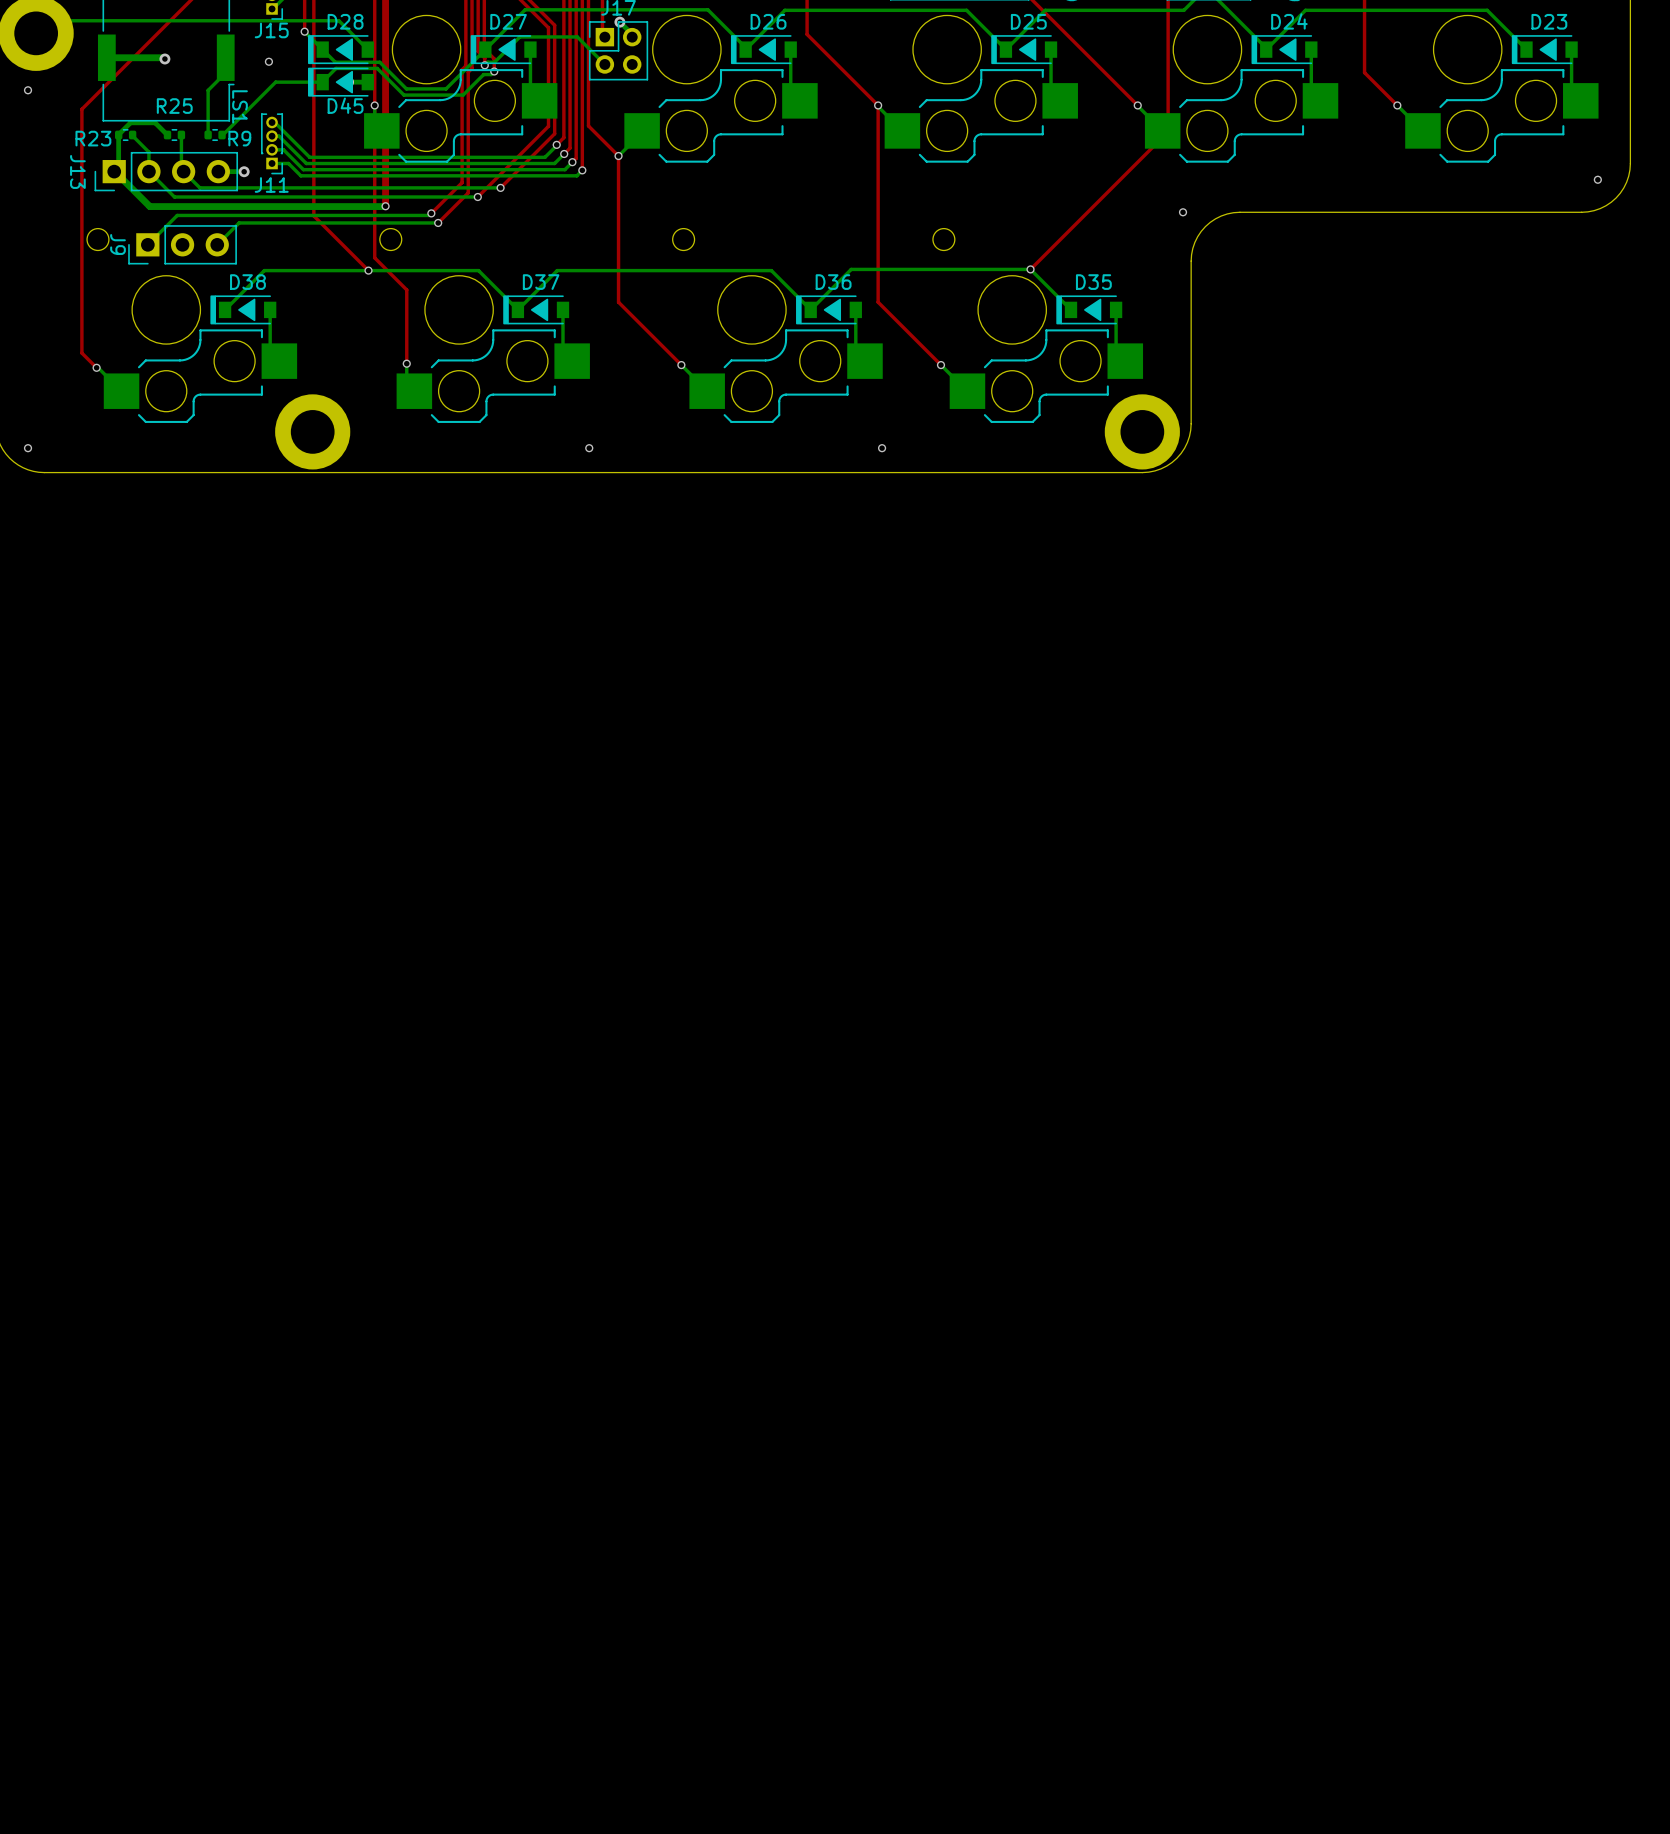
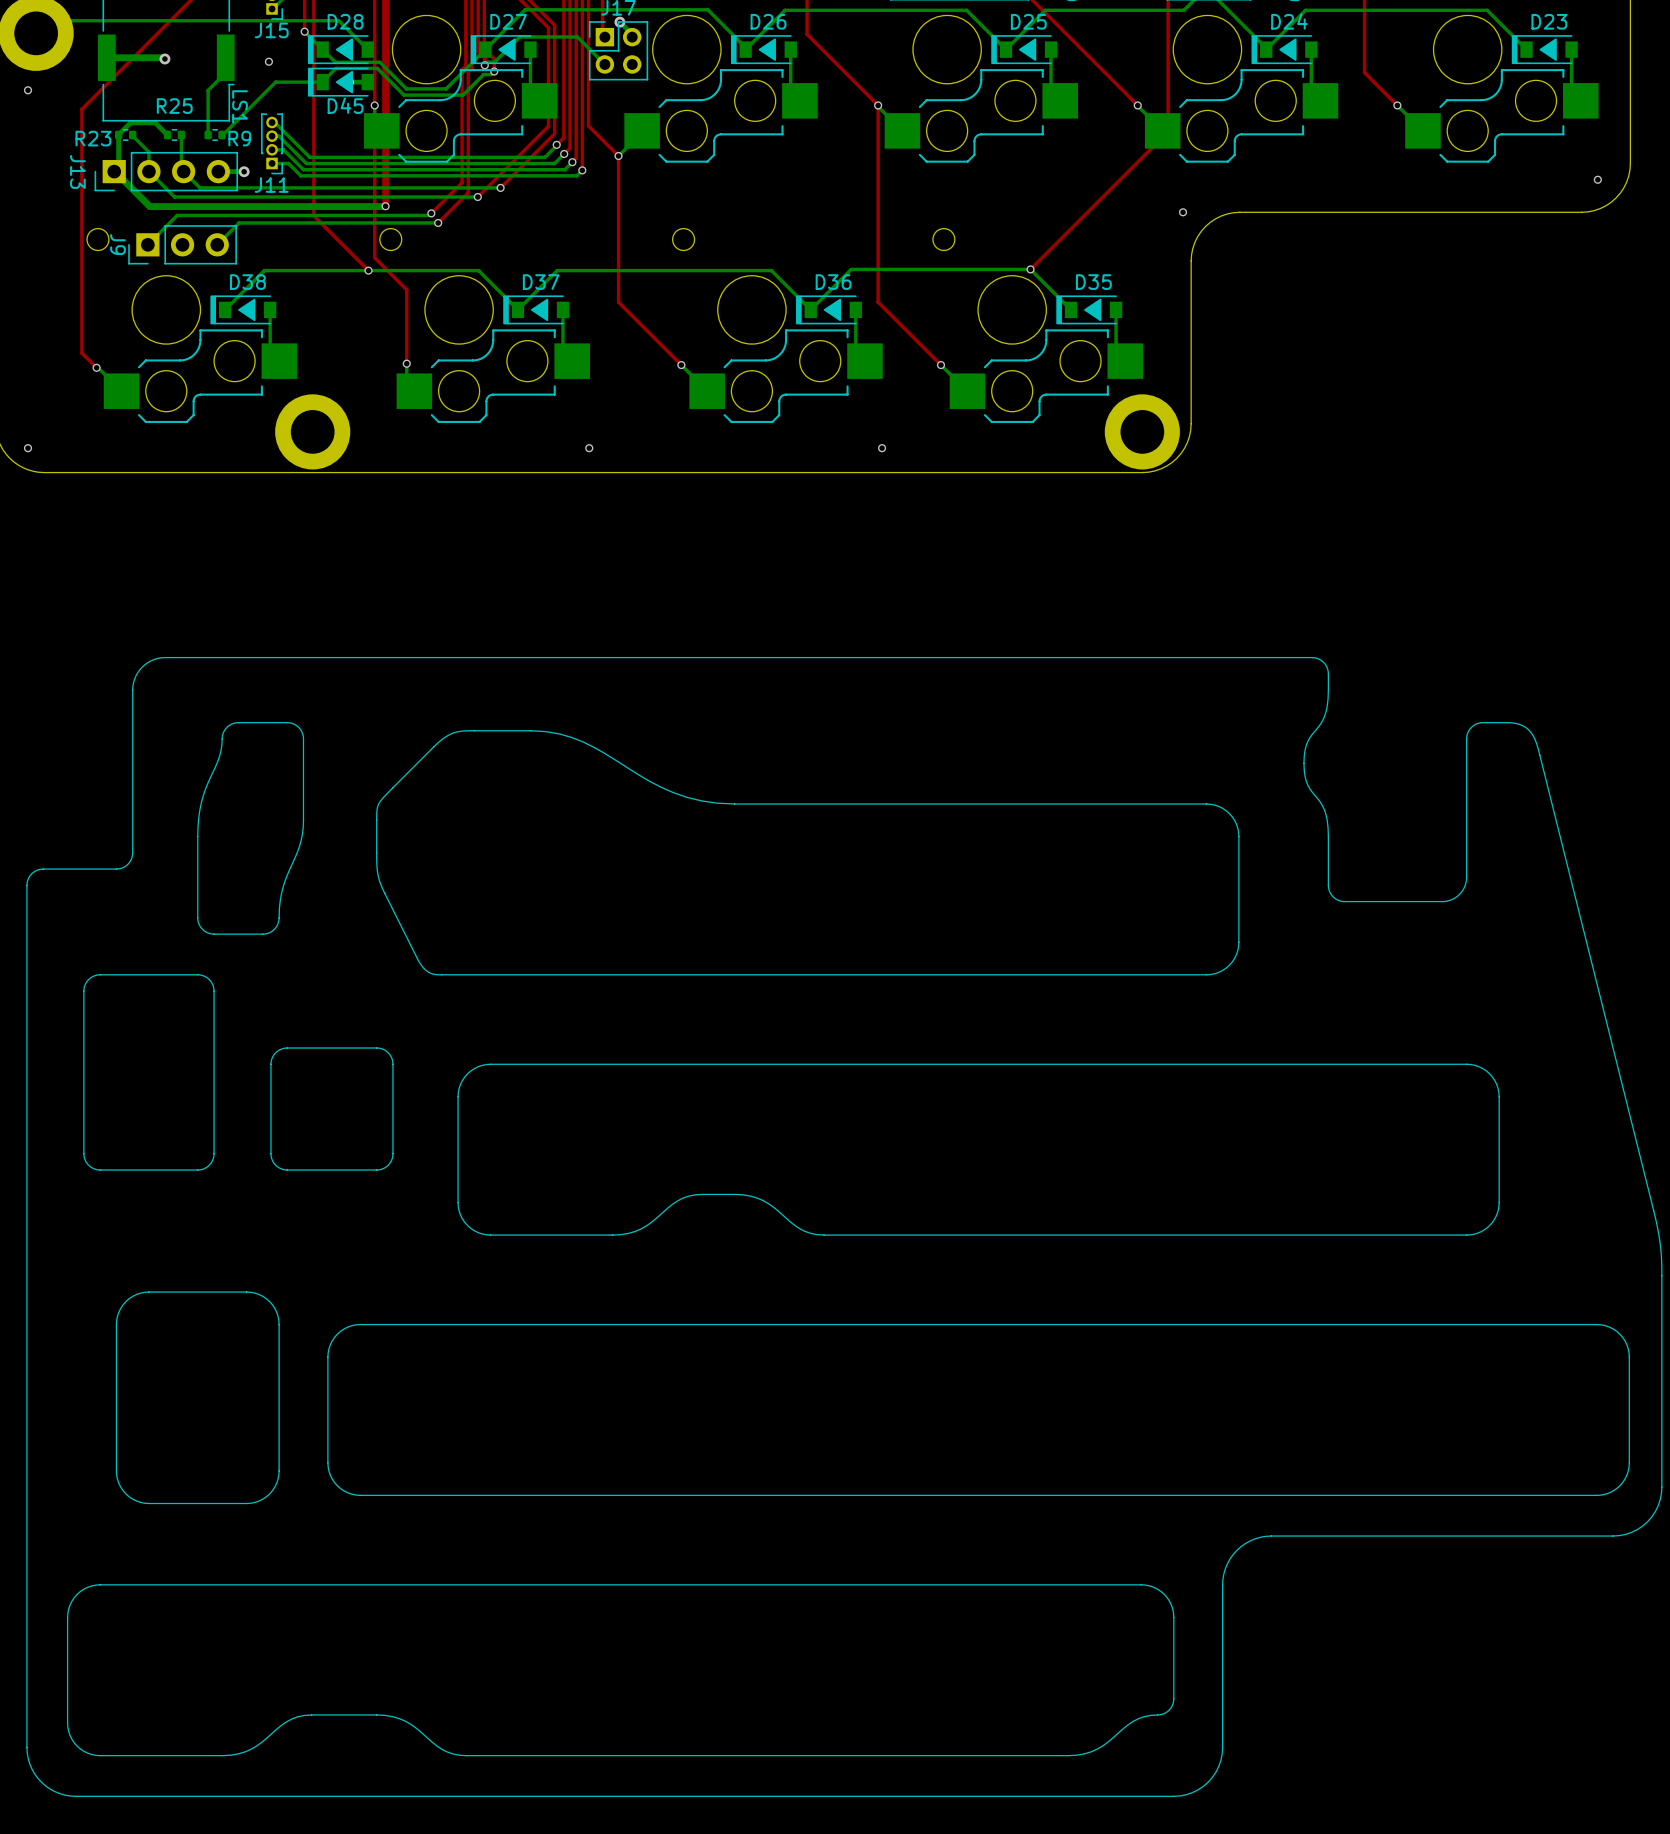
line: none -> (1312, 657) (165, 657) (154, 659) (144, 664) (135, 676) (132, 686) (132, 852) (130, 860) (126, 865) (118, 868) (39, 869) (31, 873) (27, 883) (26, 1747) (29, 1763) (37, 1777) (54, 1791) (75, 1796) (1180, 1795) (1198, 1789) (1208, 1782) (1216, 1771) (1220, 1760) (1222, 1747) (1222, 1579) (1230, 1558) (1245, 1543) (1255, 1538) (1271, 1536) (1613, 1536) (1631, 1532) (1647, 1521) (1658, 1505) (1661, 1487) (1661, 1269) (1659, 1241) (1535, 740) (1527, 728) (1511, 722) (1479, 723) (1472, 726) (1468, 731) (1466, 738) (1466, 879) (1464, 887) (1457, 896) (1442, 901) (1339, 900) (1331, 895) (1328, 887) (1328, 828) (1326, 815) (1320, 802) (1307, 785) (1304, 770) (1306, 745) (1322, 720) (1328, 698) (1327, 667) (1320, 659) (1312, 657)
line: none -> (531, 730) (465, 730) (449, 734) (433, 747) (385, 795) (378, 805) (376, 861) (379, 880) (418, 961) (431, 973) (1206, 974) (1217, 972) (1226, 967) (1237, 953) (1238, 942) (1238, 832) (1236, 824) (1229, 813) (1214, 805) (717, 803) (686, 797) (660, 787) (594, 747) (571, 737) (545, 731) (531, 730)
line: none -> (279, 917) (274, 929) (262, 934) (210, 933) (202, 929) (198, 921) (197, 836) (200, 809) (205, 789) (219, 755) (223, 733) (228, 726) (234, 723) (289, 722) (297, 726) (302, 734) (302, 834) (282, 887) (279, 917)
line: none -> (197, 974) (98, 974) (91, 977) (85, 984) (83, 991) (83, 1153) (86, 1161) (92, 1167) (100, 1170) (199, 1169) (206, 1167) (212, 1160) (214, 1153) (213, 988) (207, 978) (197, 974)
line: none -> (376, 1048) (285, 1048) (274, 1054) (270, 1064) (270, 1153) (272, 1159) (277, 1166) (287, 1170) (376, 1170) (382, 1168) (389, 1163) (392, 1153) (392, 1062) (388, 1052) (376, 1048)
line: none -> (1466, 1064) (486, 1064) (478, 1066) (467, 1073) (462, 1080) (458, 1092) (458, 1206) (460, 1215) (467, 1225) (478, 1232) (490, 1235) (612, 1235) (628, 1233) (646, 1225) (677, 1200) (688, 1196) (702, 1194) (743, 1194) (757, 1198) (773, 1207) (799, 1228) (810, 1233) (824, 1235) (1470, 1234) (1480, 1231) (1489, 1225) (1498, 1209) (1499, 1096) (1496, 1084) (1489, 1073) (1479, 1066) (1466, 1064)
line: none -> (246, 1292) (144, 1292) (129, 1298) (120, 1308) (116, 1324) (116, 1470) (120, 1487) (132, 1499) (148, 1503) (250, 1503) (262, 1499) (274, 1487) (279, 1470) (278, 1320) (274, 1307) (266, 1299) (257, 1293) (246, 1292)
line: none -> (1596, 1324) (356, 1324) (344, 1328) (337, 1334) (330, 1344) (328, 1352) (328, 1467) (332, 1479) (337, 1485) (347, 1492) (360, 1495) (1600, 1495) (1617, 1488) (1624, 1480) (1628, 1470) (1629, 1357) (1626, 1344) (1619, 1334) (1609, 1327) (1596, 1324)
line: none -> (1141, 1584) (95, 1585) (87, 1587) (77, 1594) (70, 1604) (67, 1613) (67, 1727) (71, 1739) (77, 1746) (87, 1753) (100, 1755) (222, 1755) (238, 1753) (256, 1746) (287, 1721) (298, 1716) (311, 1714) (392, 1716) (410, 1724) (441, 1749) (452, 1753) (466, 1755) (1076, 1755) (1096, 1749) (1133, 1721) (1144, 1716) (1163, 1713) (1172, 1704) (1172, 1608) (1167, 1597) (1161, 1591) (1153, 1587) (1141, 1584)

